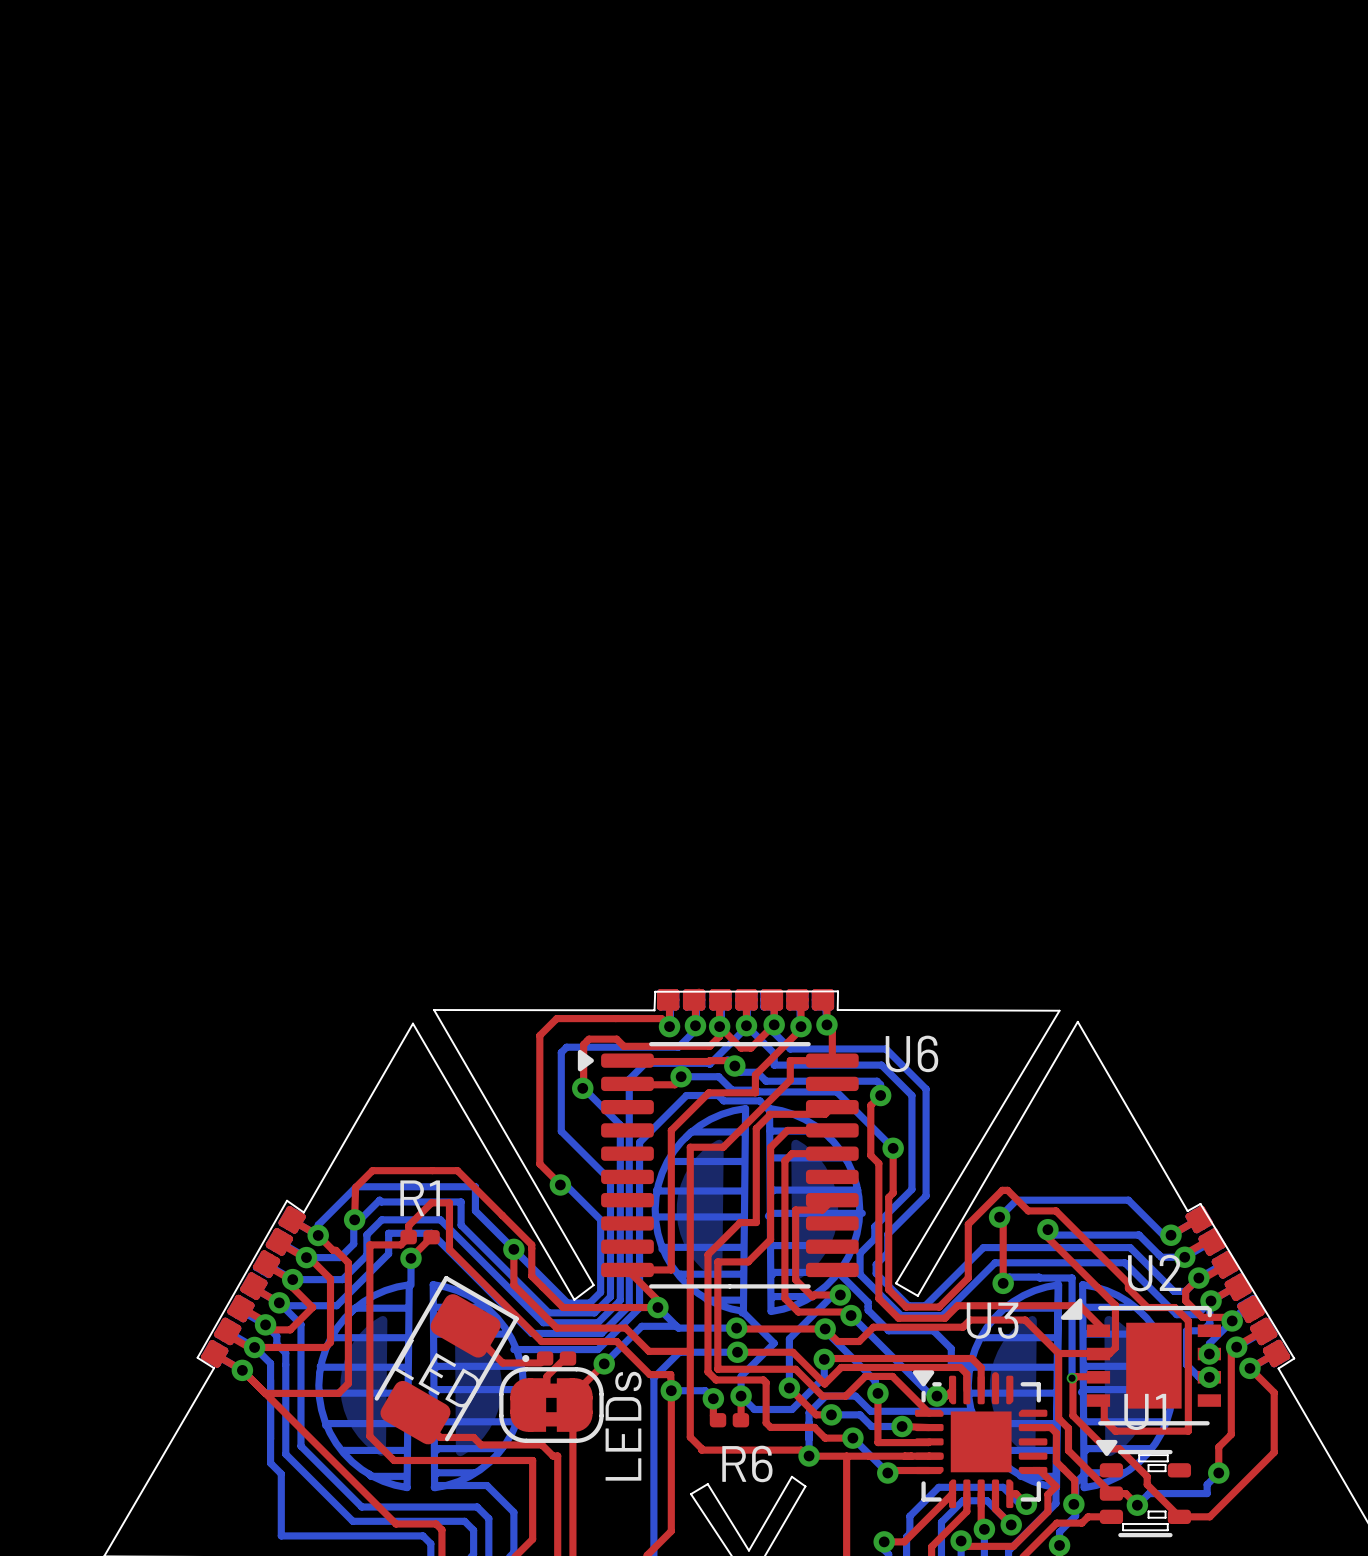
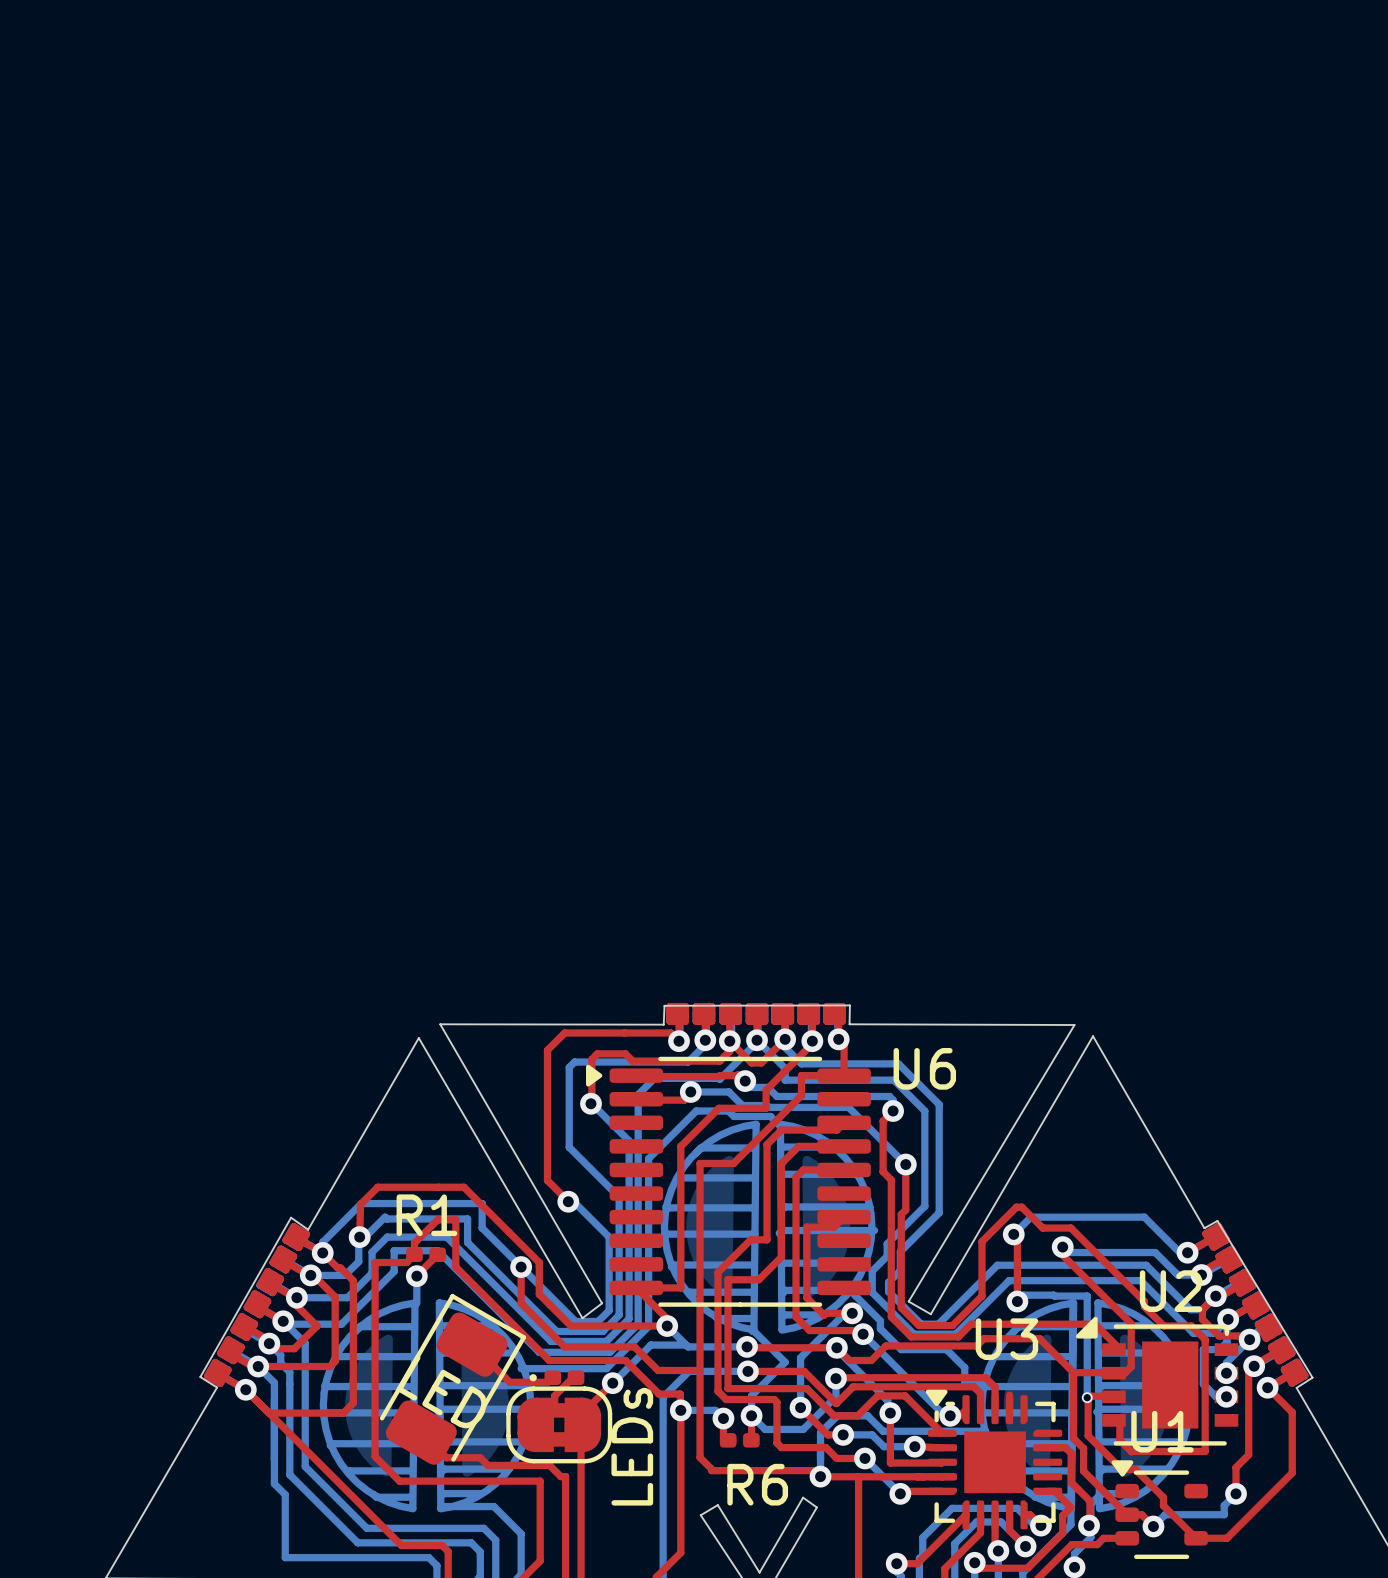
board edge: (1139, 1455) (1167, 1455) (1167, 1461) (1139, 1461) (1139, 1455) -> none
board edge: (1148, 1464) (1165, 1464) (1165, 1471) (1148, 1471) (1148, 1464) -> none
board edge: (1148, 1511) (1148, 1517) (1165, 1517) (1165, 1511) (1148, 1511) -> none
board edge: (1123, 1524) (1167, 1524) (1167, 1530) (1123, 1530) (1123, 1524) -> none

